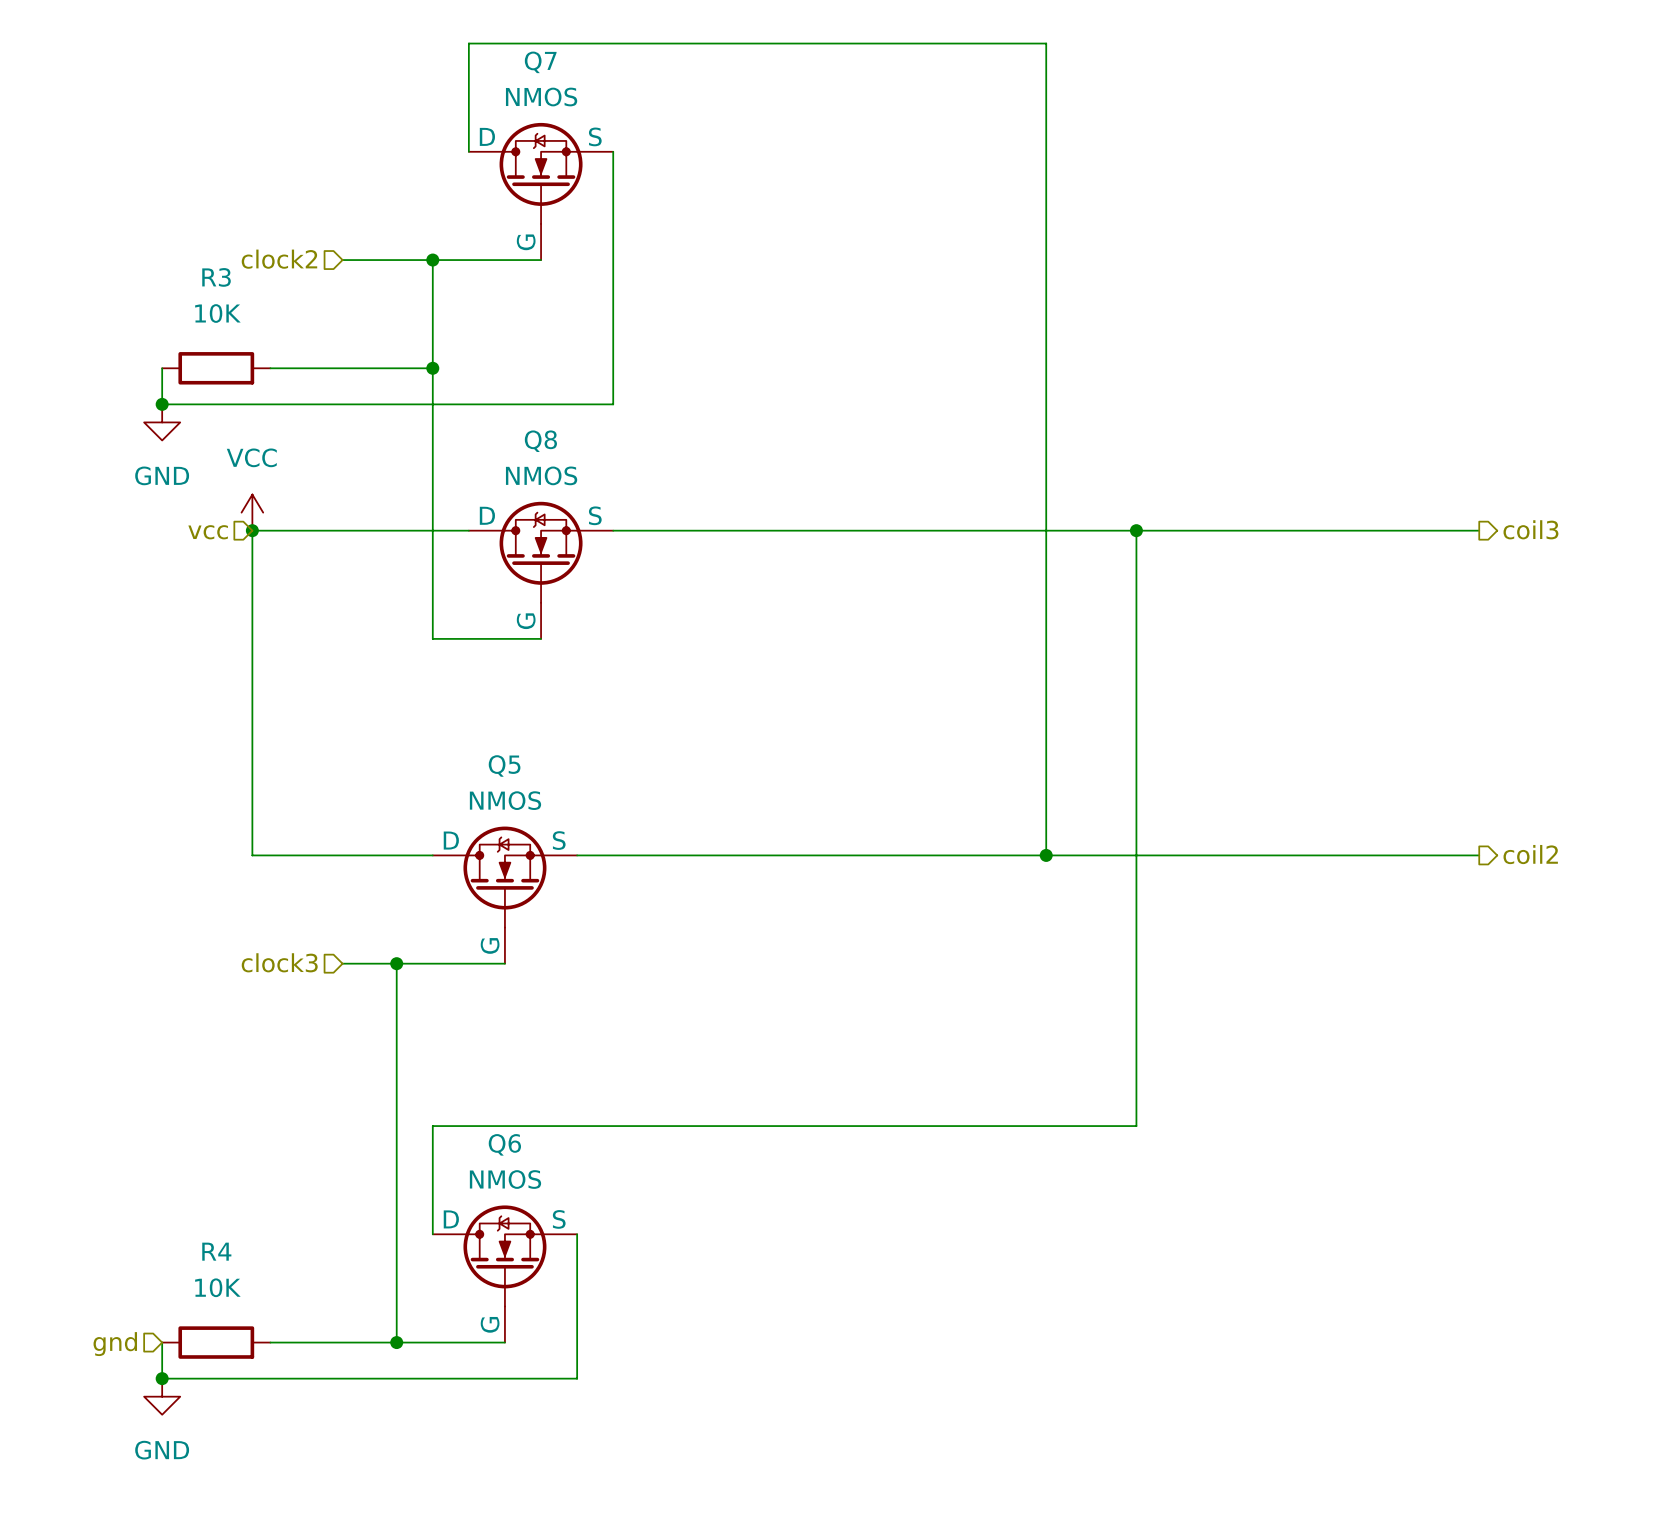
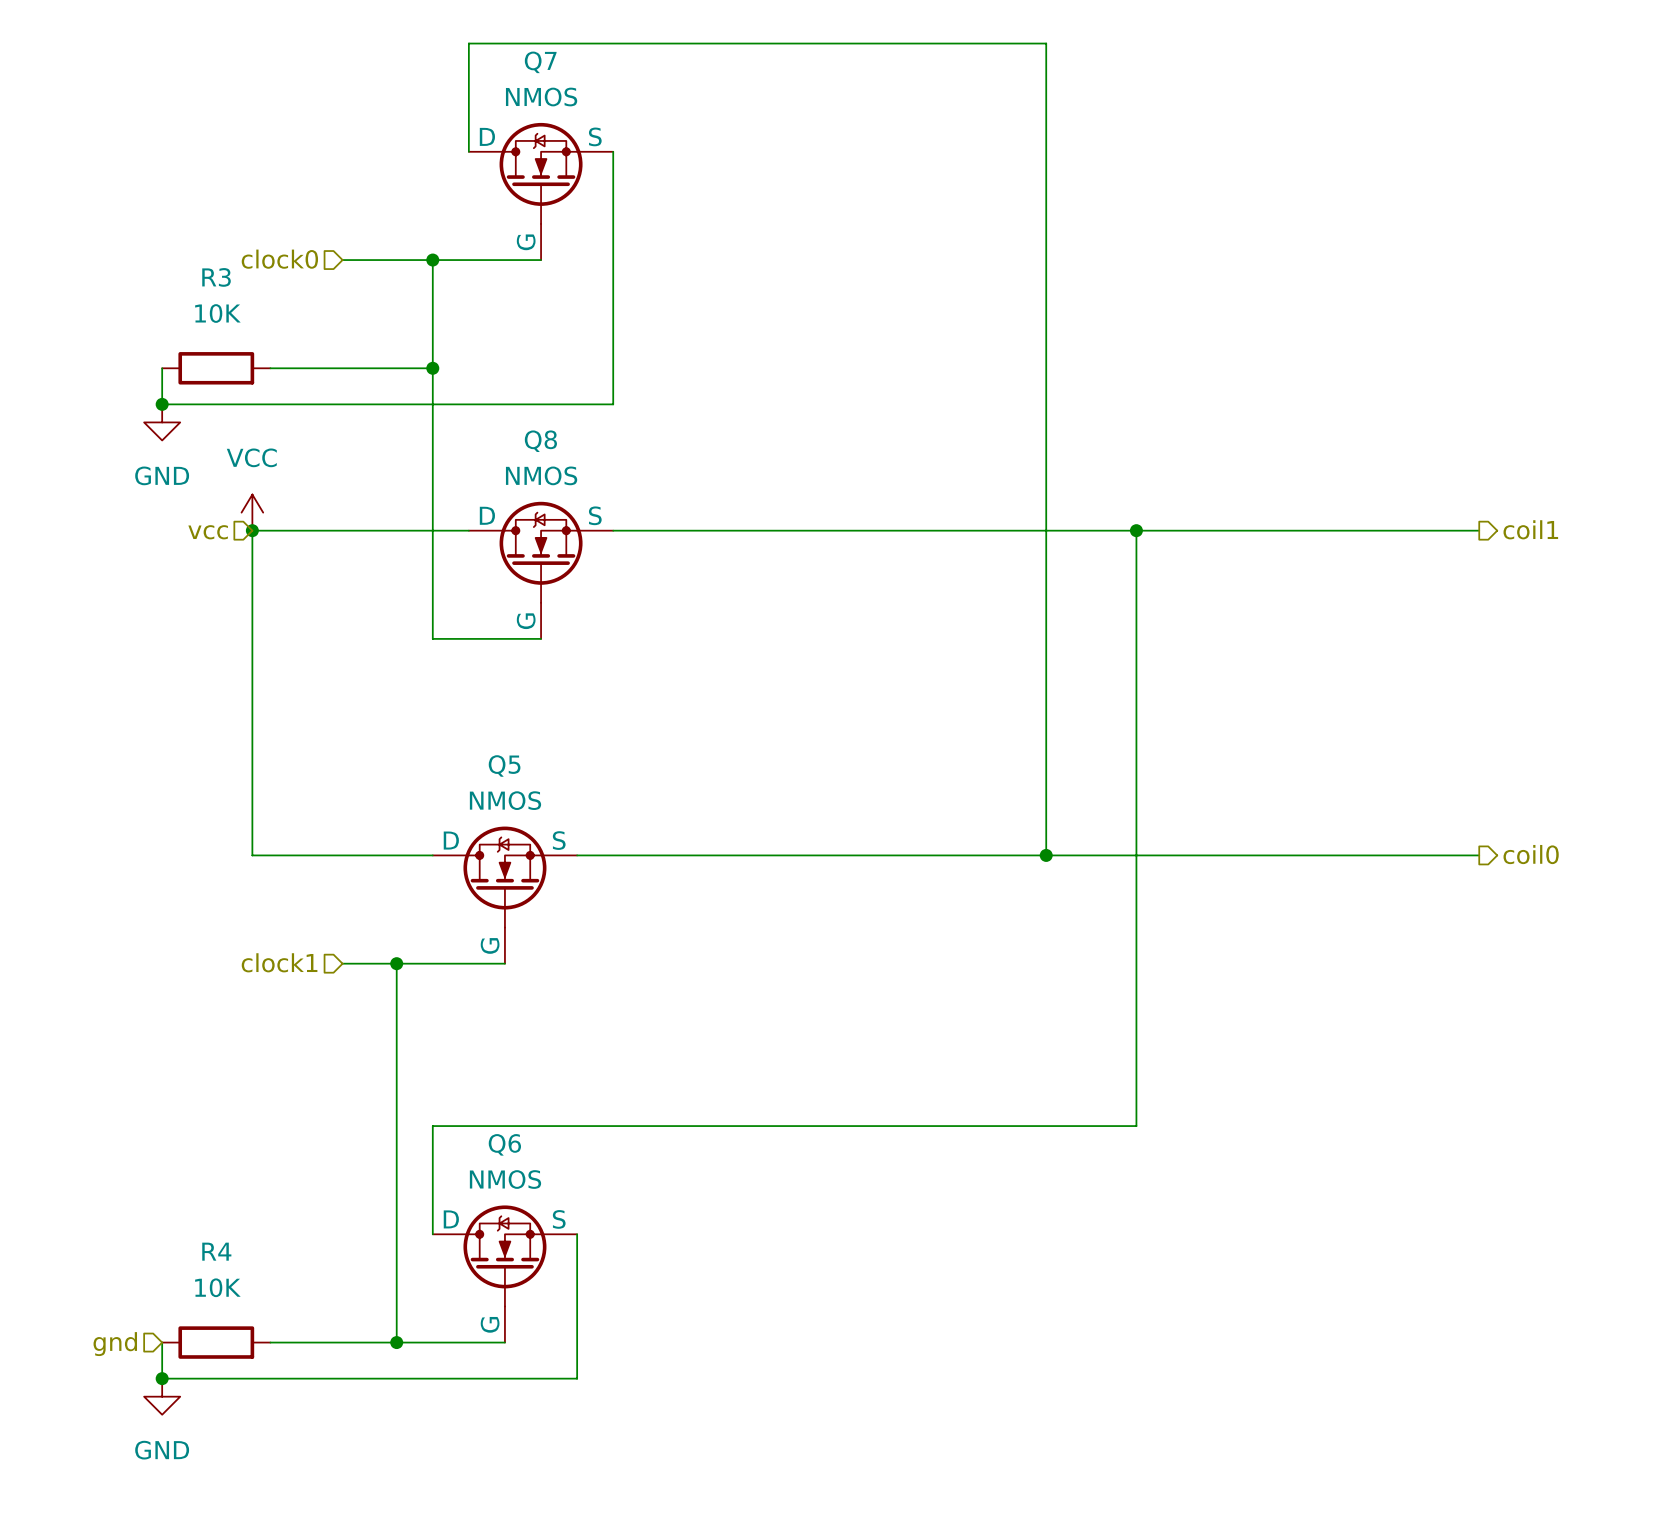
hierarchical label: clock2 (279, 259) -> clock0 (279, 259)
hierarchical label: coil3 (1530, 529) -> coil1 (1530, 529)
hierarchical label: coil2 (1530, 854) -> coil0 (1531, 854)
hierarchical label: clock3 (279, 962) -> clock1 (279, 962)

